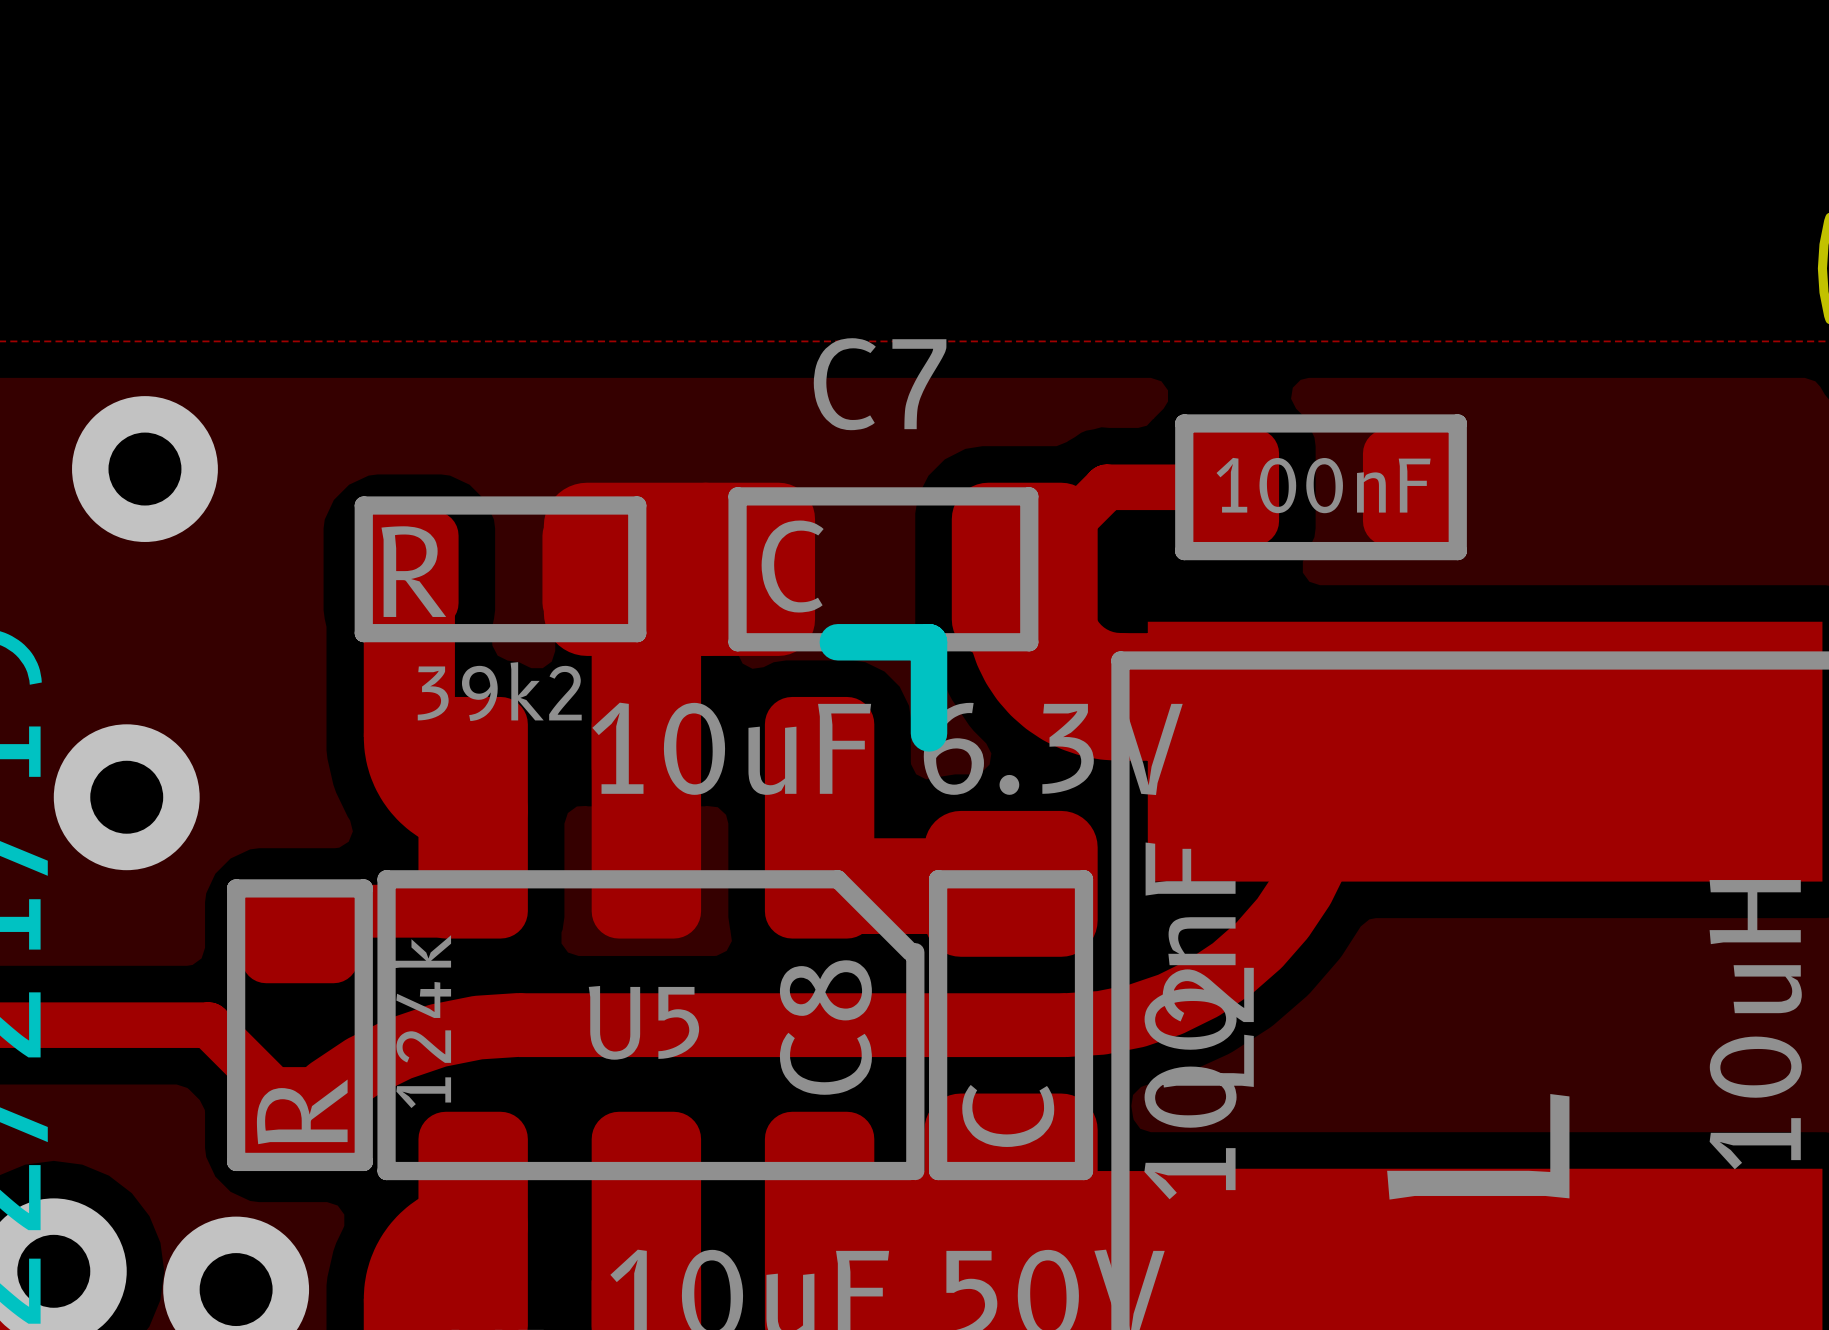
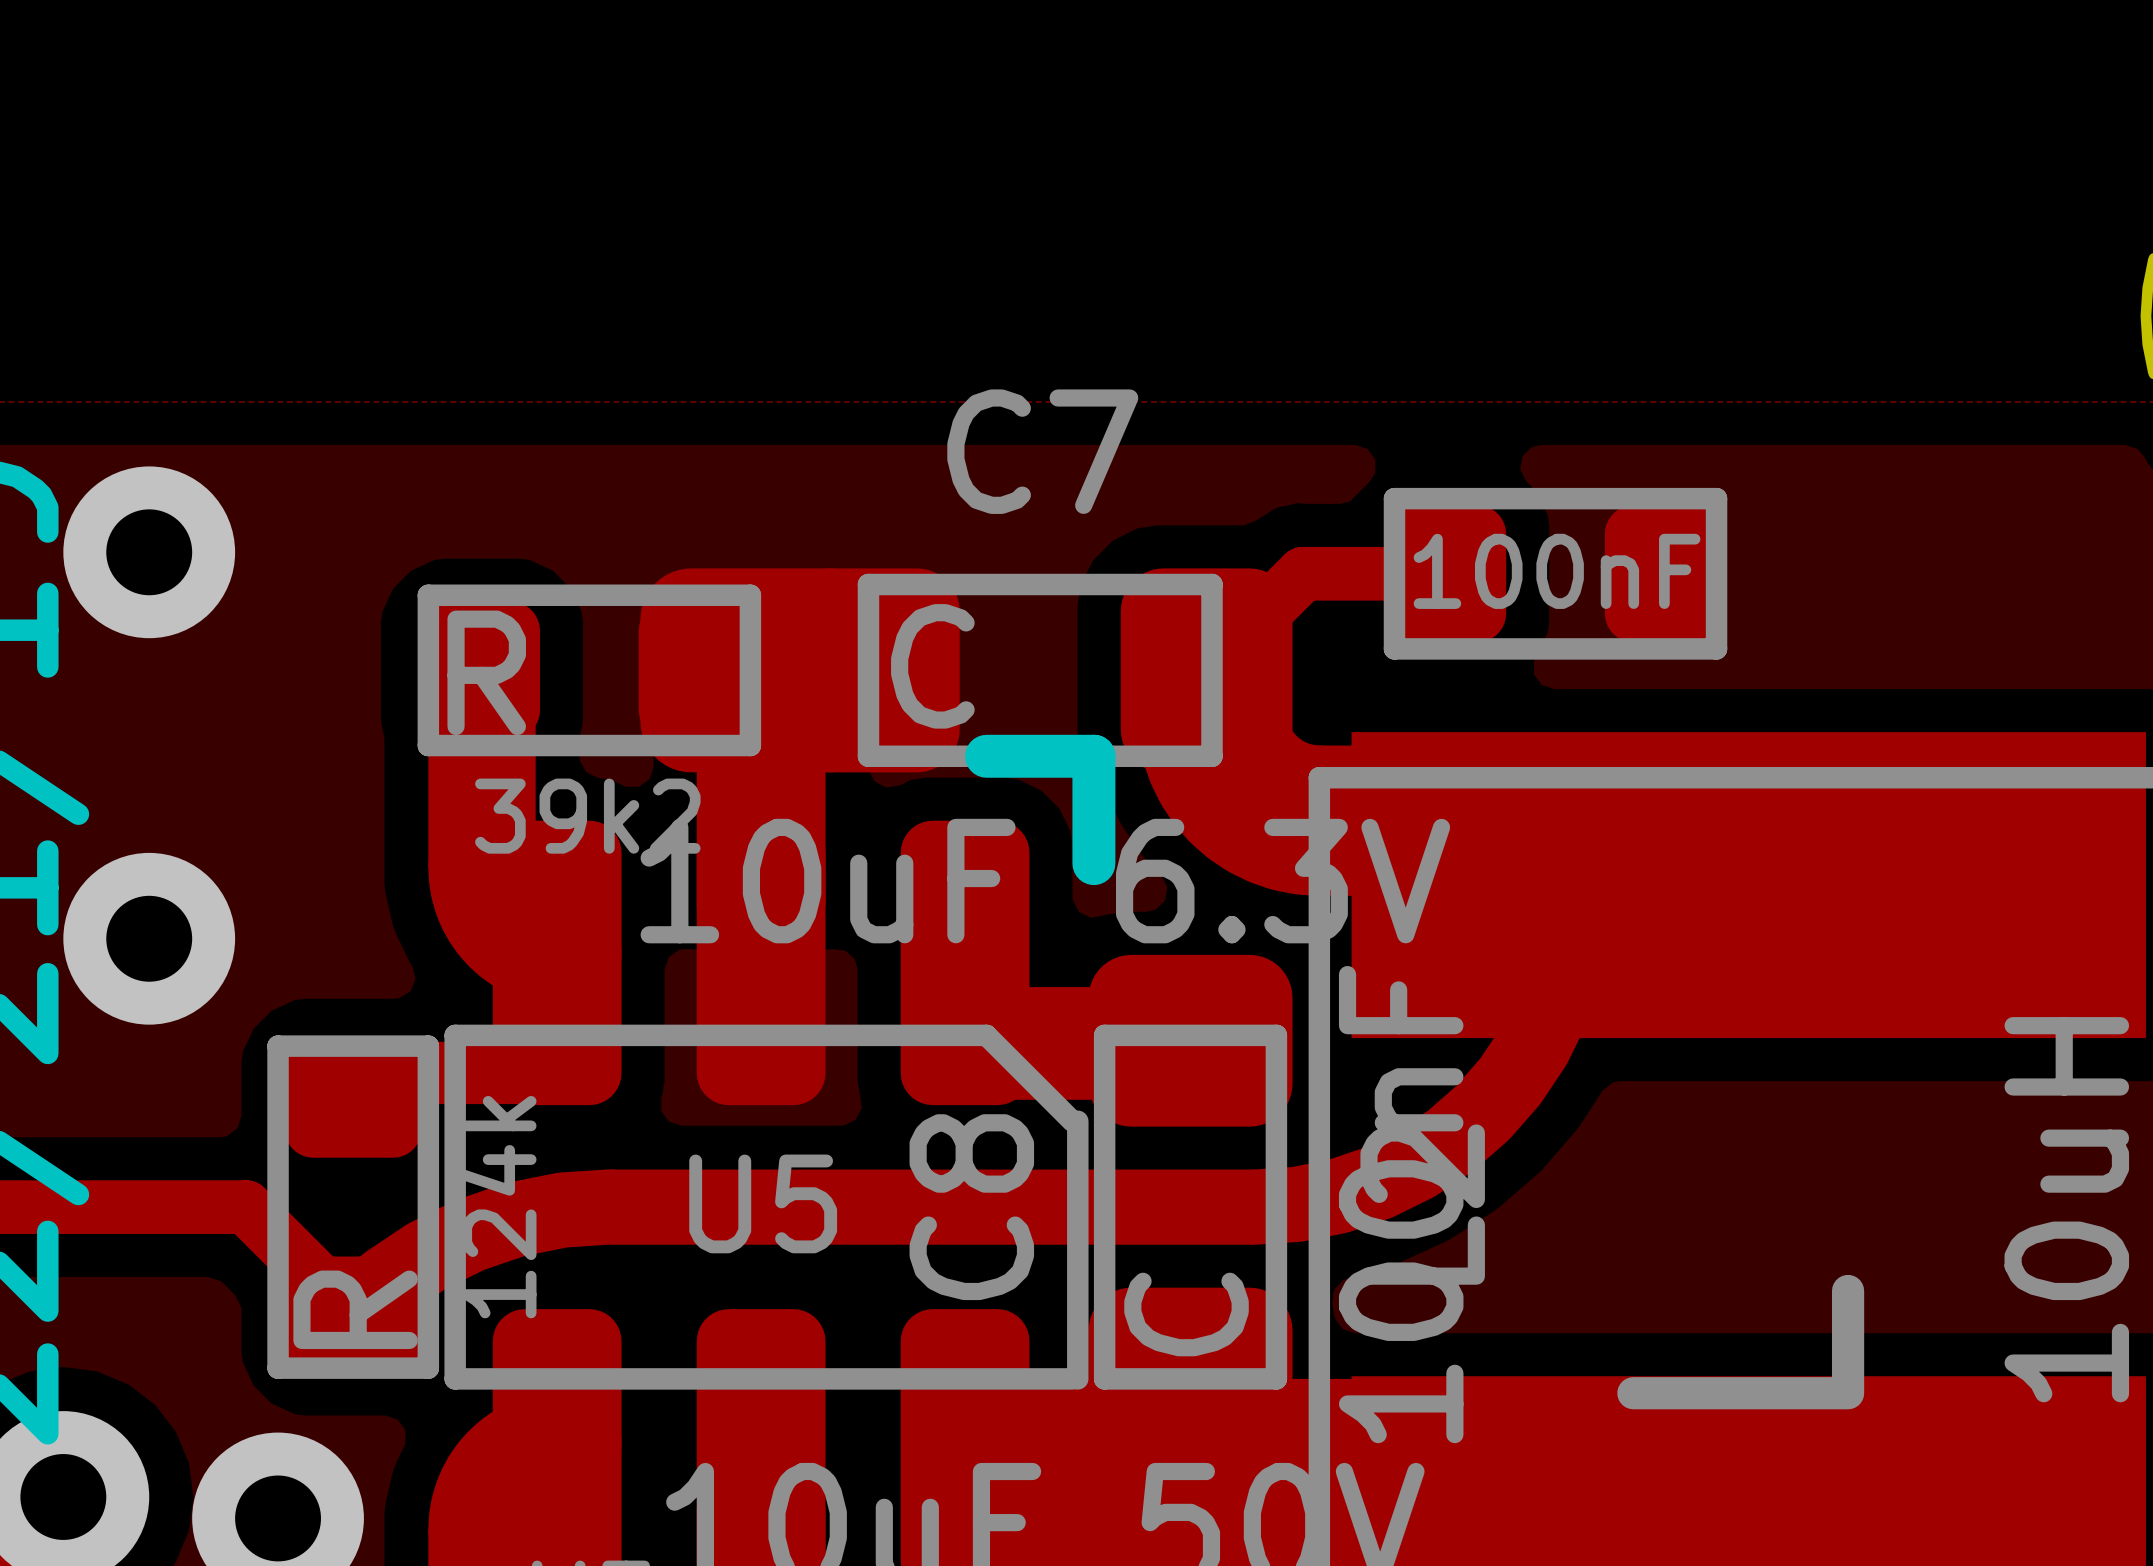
via position: (144, 469) -> (149, 552)

